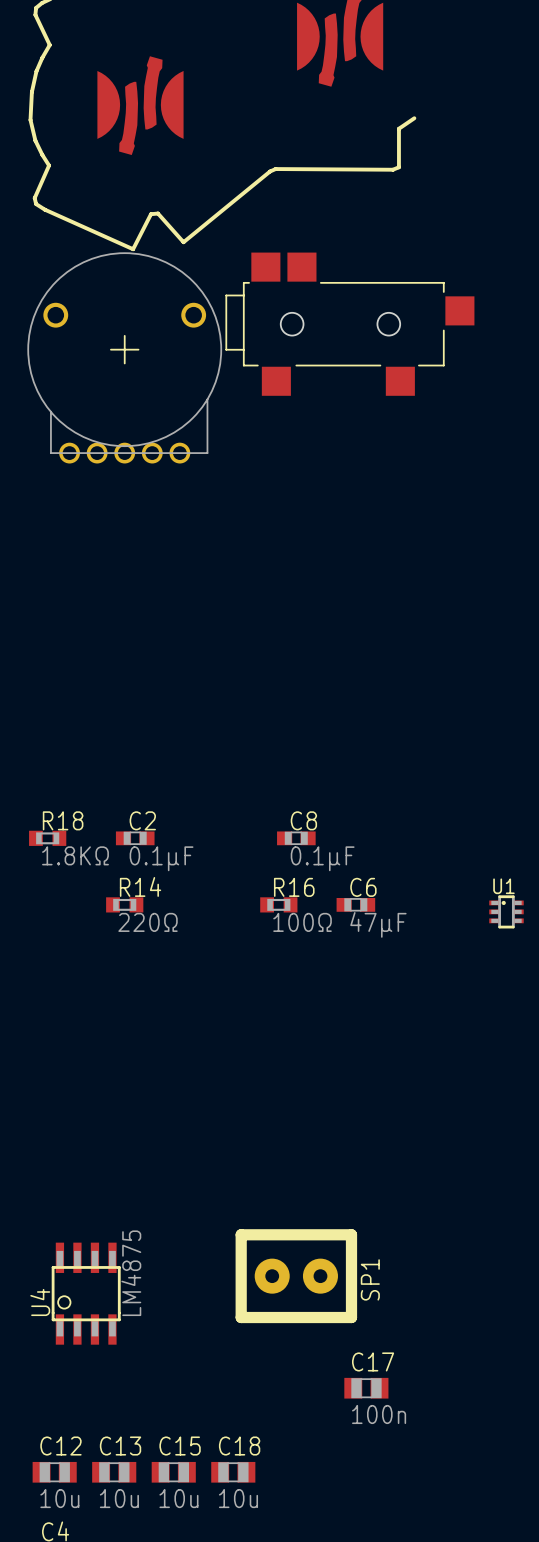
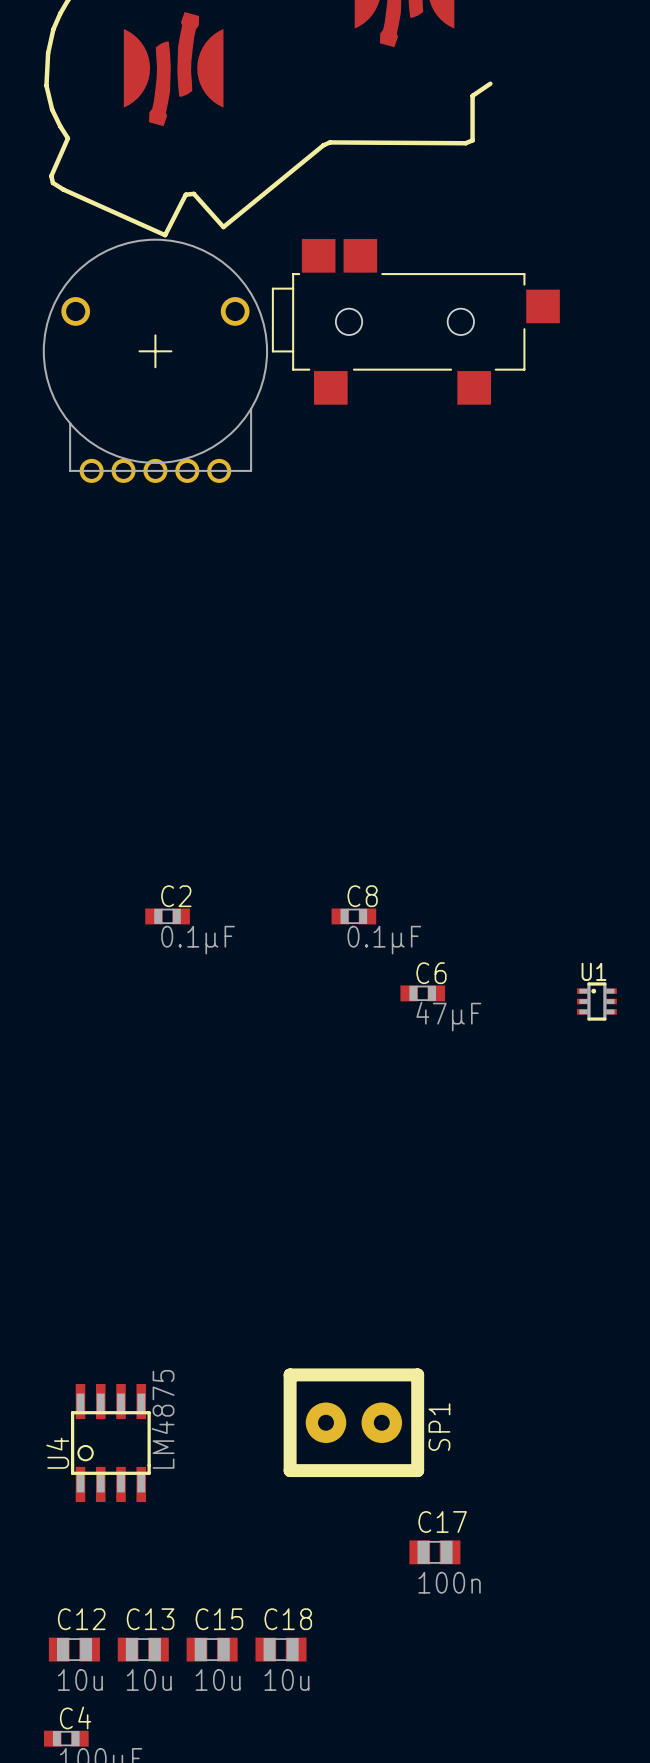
R18: 1.8KΩ (47, 838) -> none
R14: 220Ω (124, 904) -> none
R16: 100Ω (278, 904) -> none

